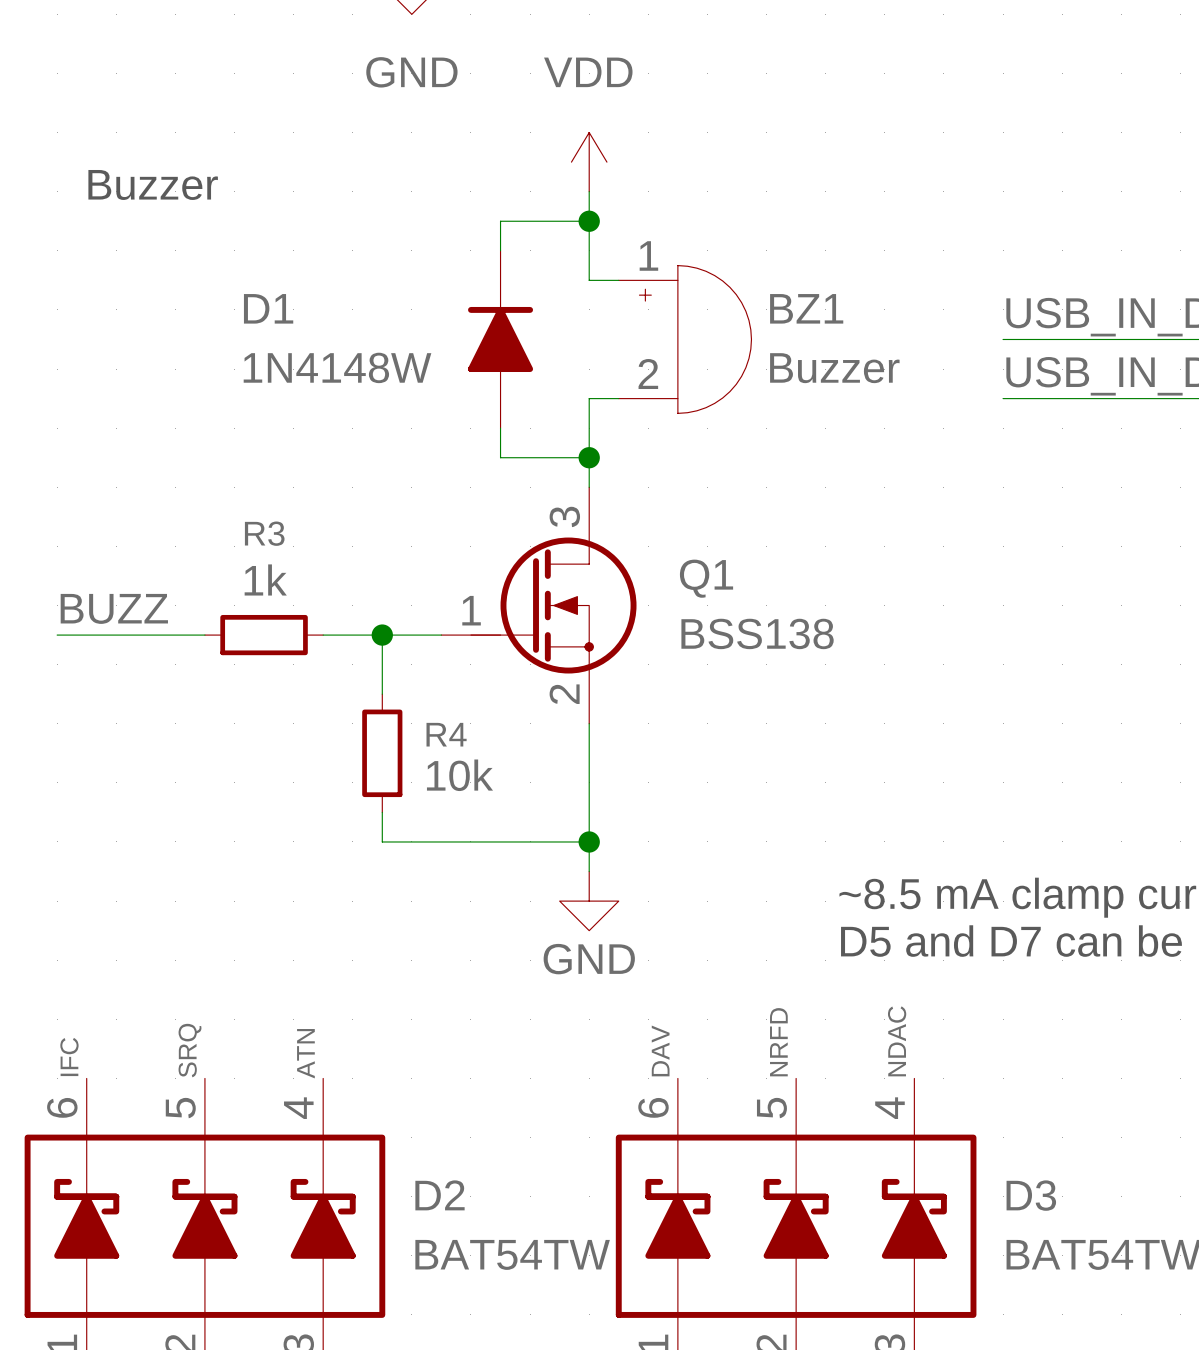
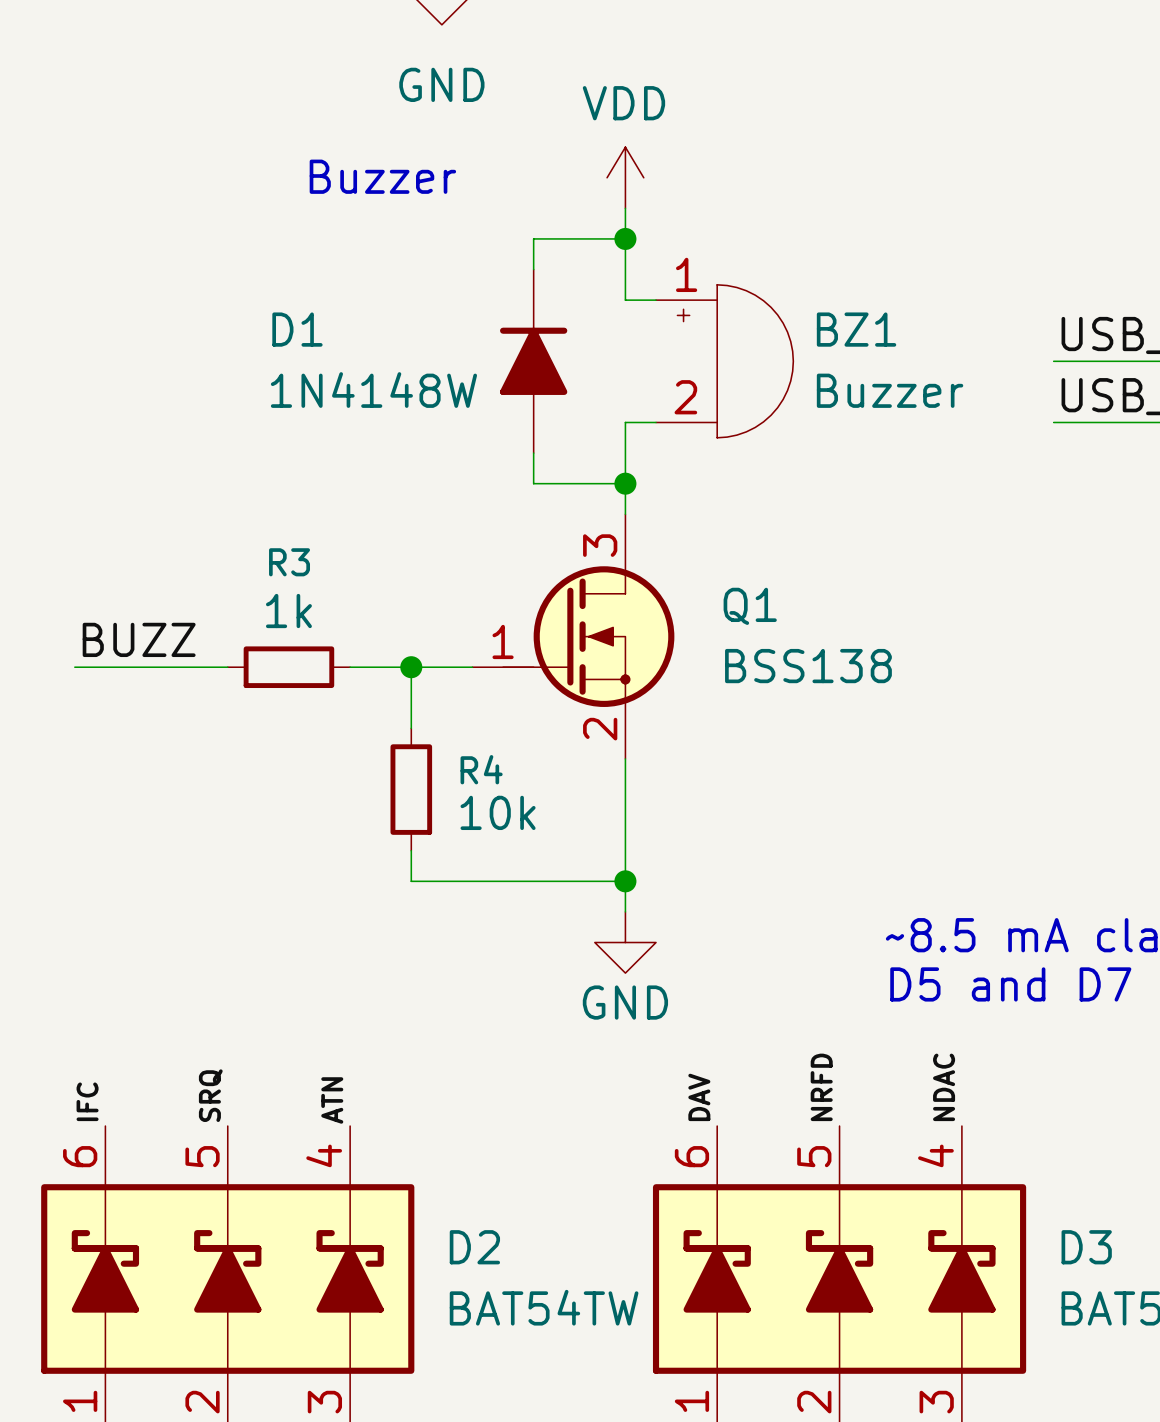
power symbol text position: VDD (588, 72) -> VDD (623, 103)
text position: Buzzer (153, 184) -> Buzzer (382, 176)

